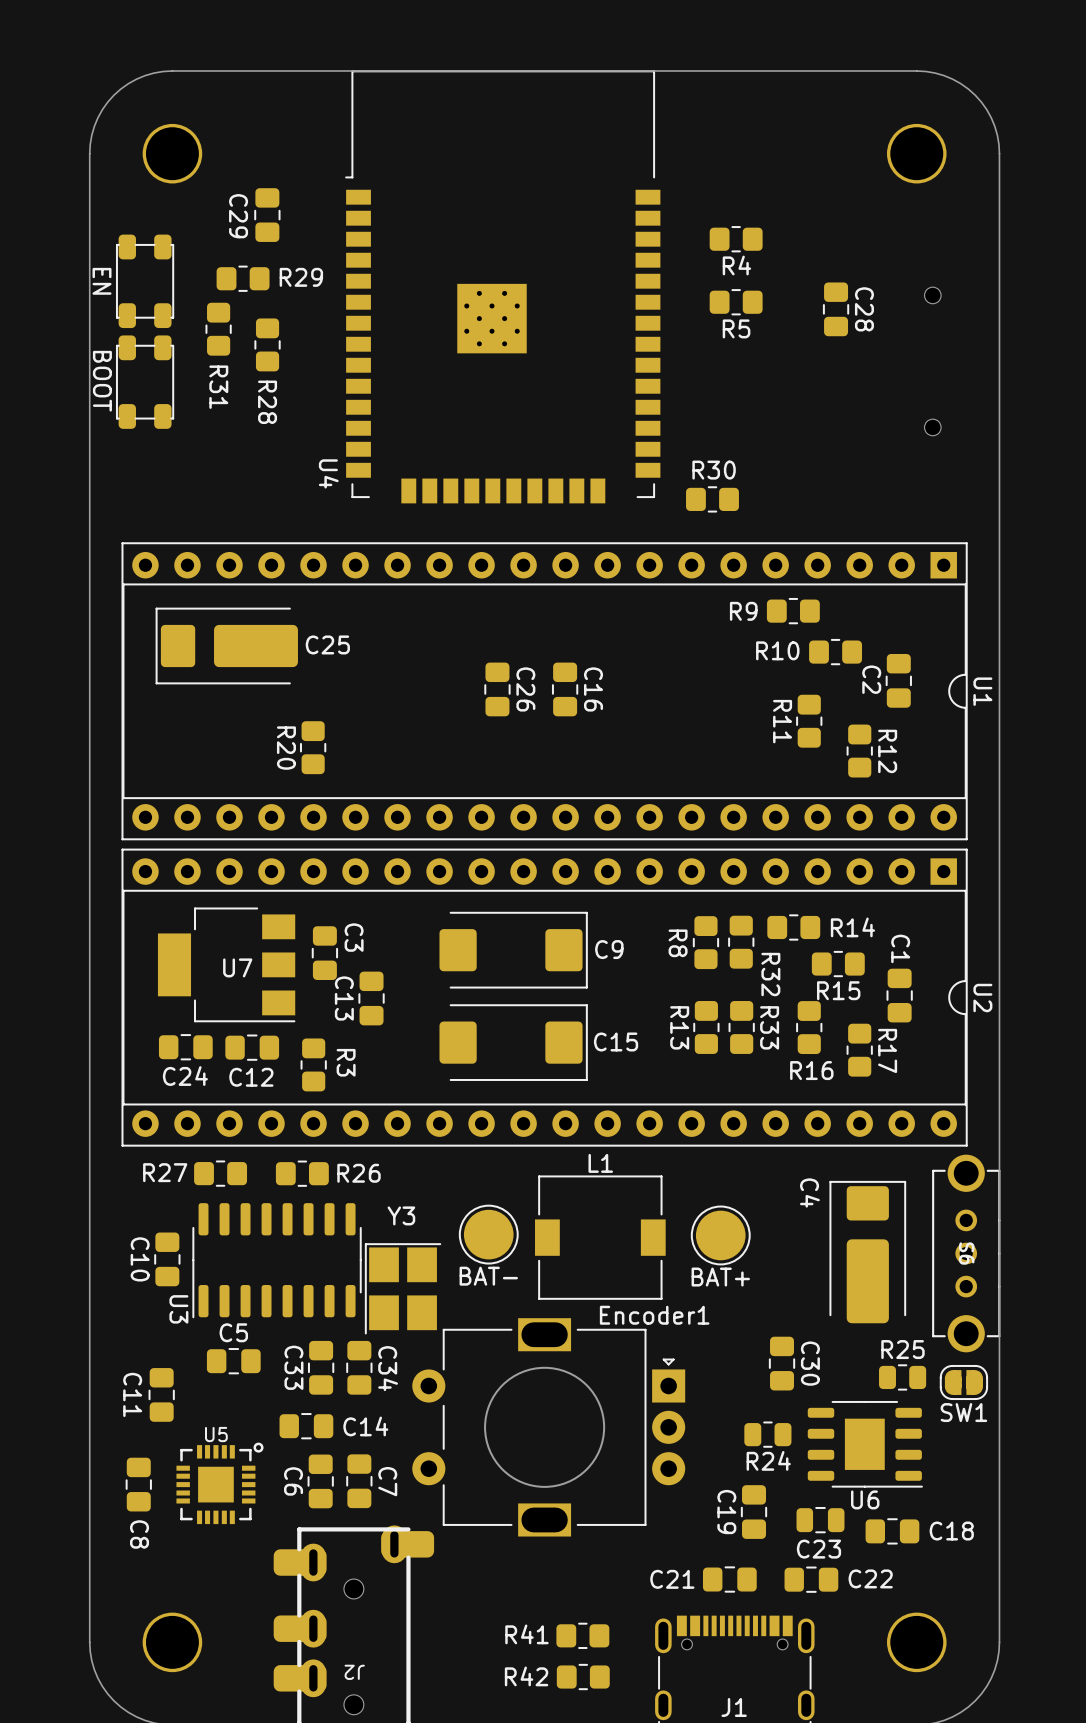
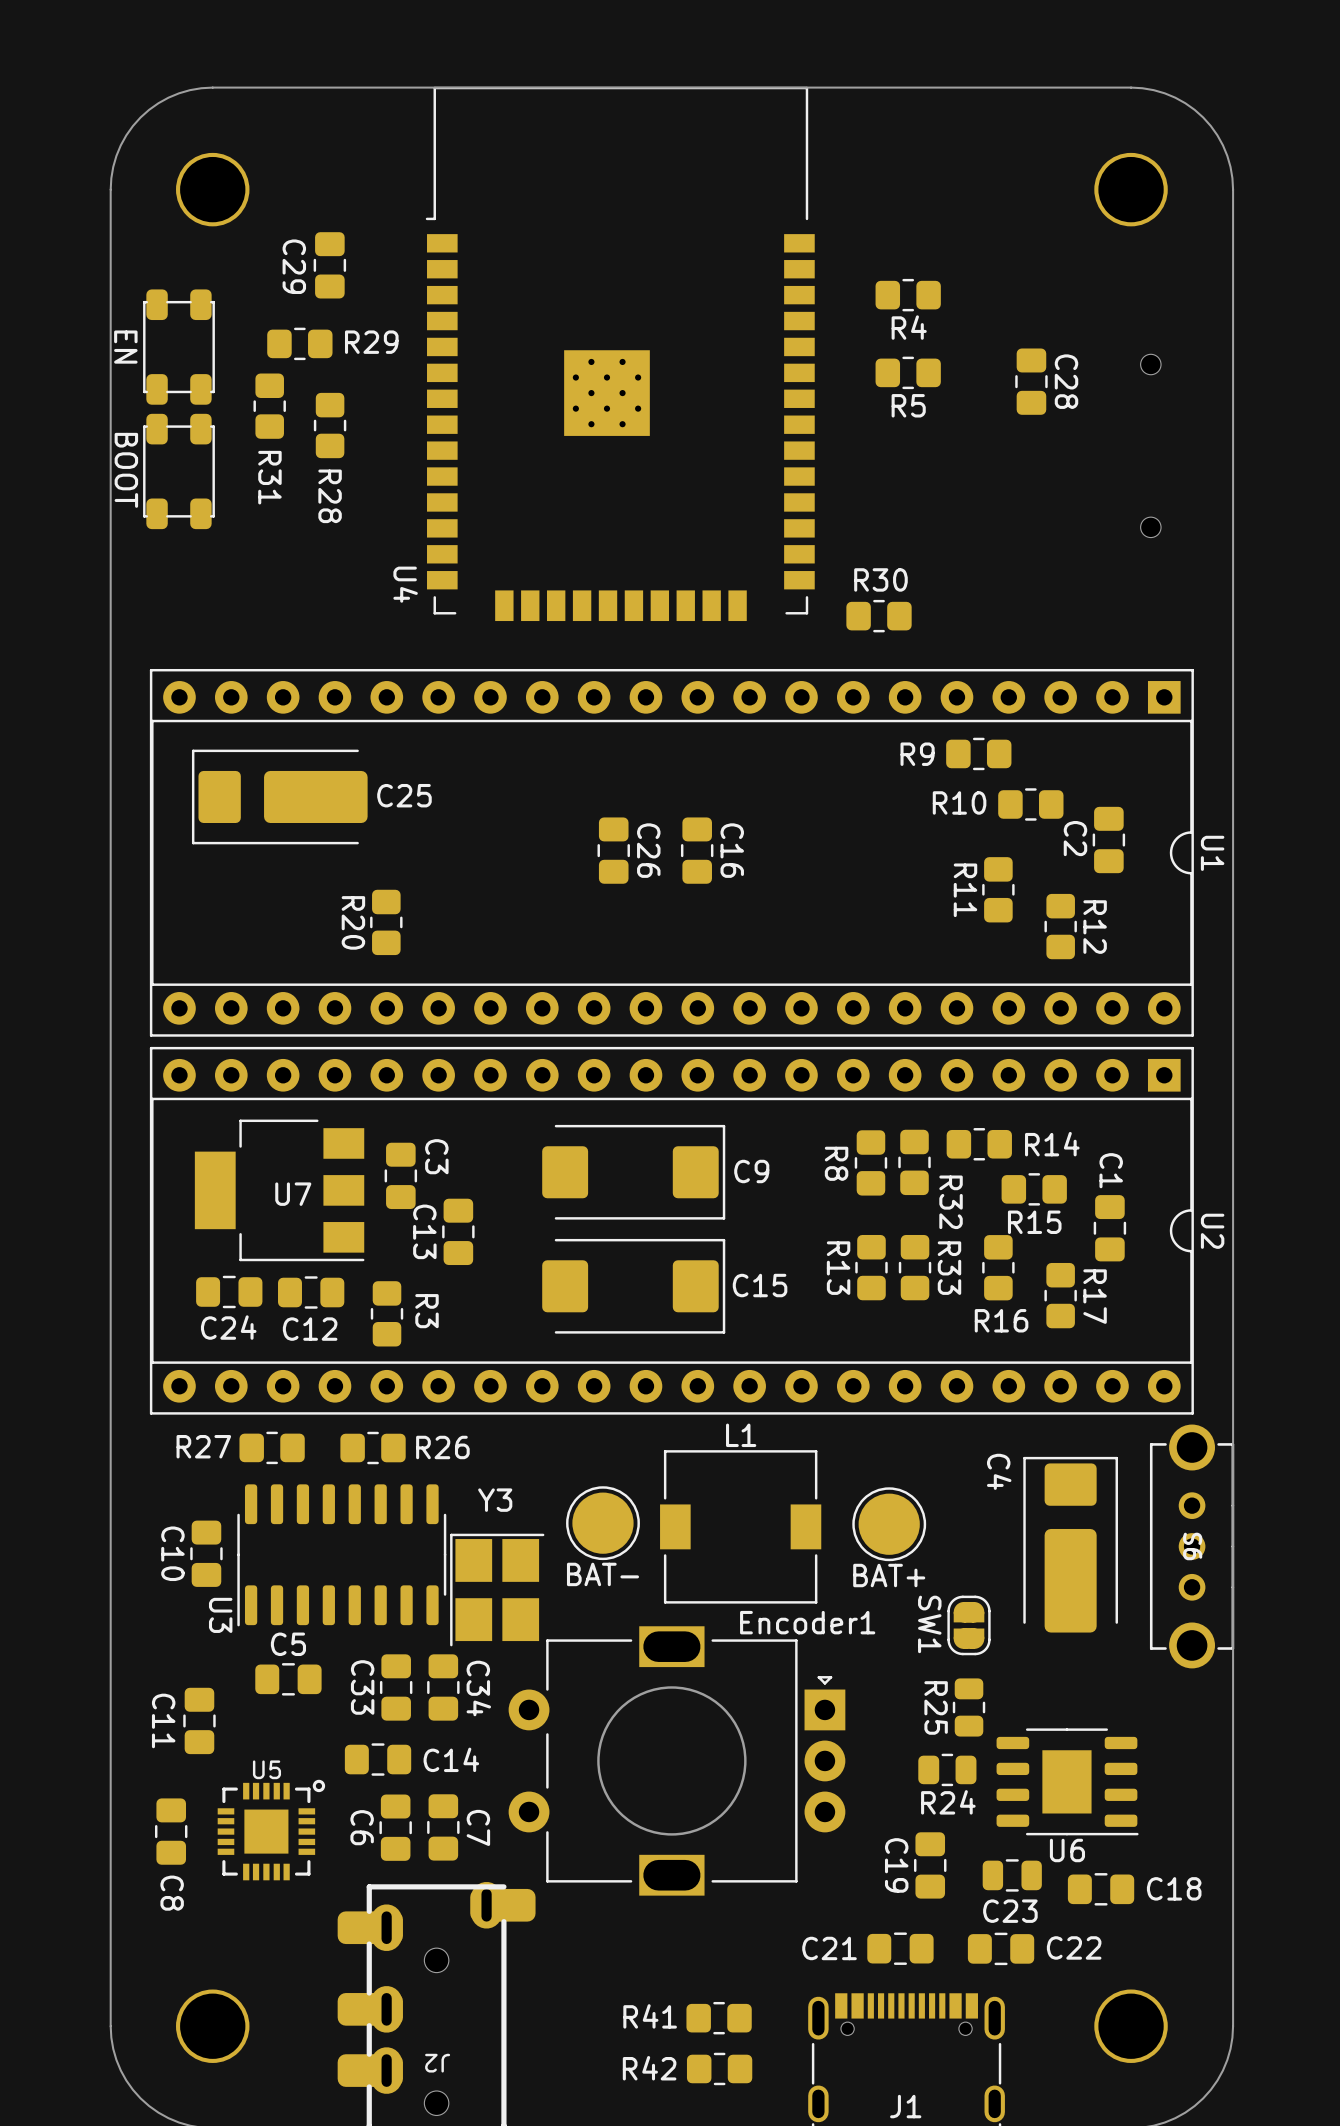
R25 name position: R25 (902, 1349) -> R25 (936, 1707)
C30: (782, 1363) -> none
R25 rotation: 0° (902, 1377) -> 90° clockwise (969, 1707)
R25 position: (902, 1377) -> (969, 1707)
SW1 rotation: 0° (963, 1382) -> 90° clockwise (969, 1625)
SW1 position: (963, 1382) -> (969, 1625)

